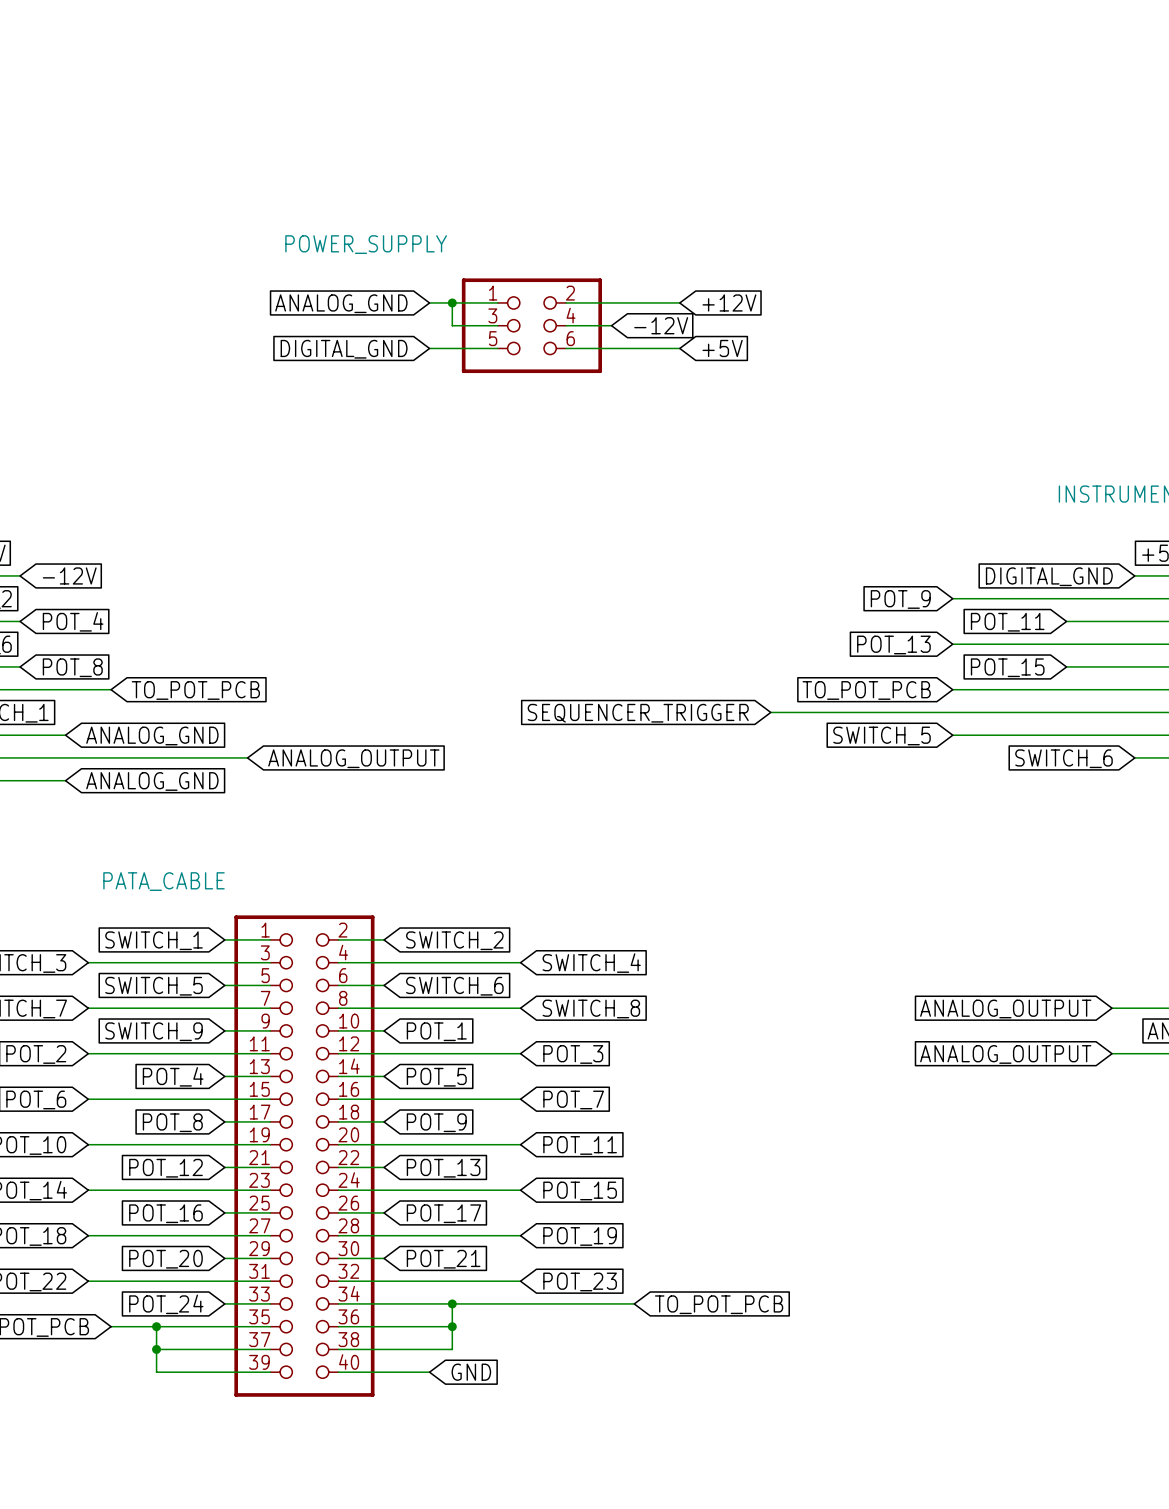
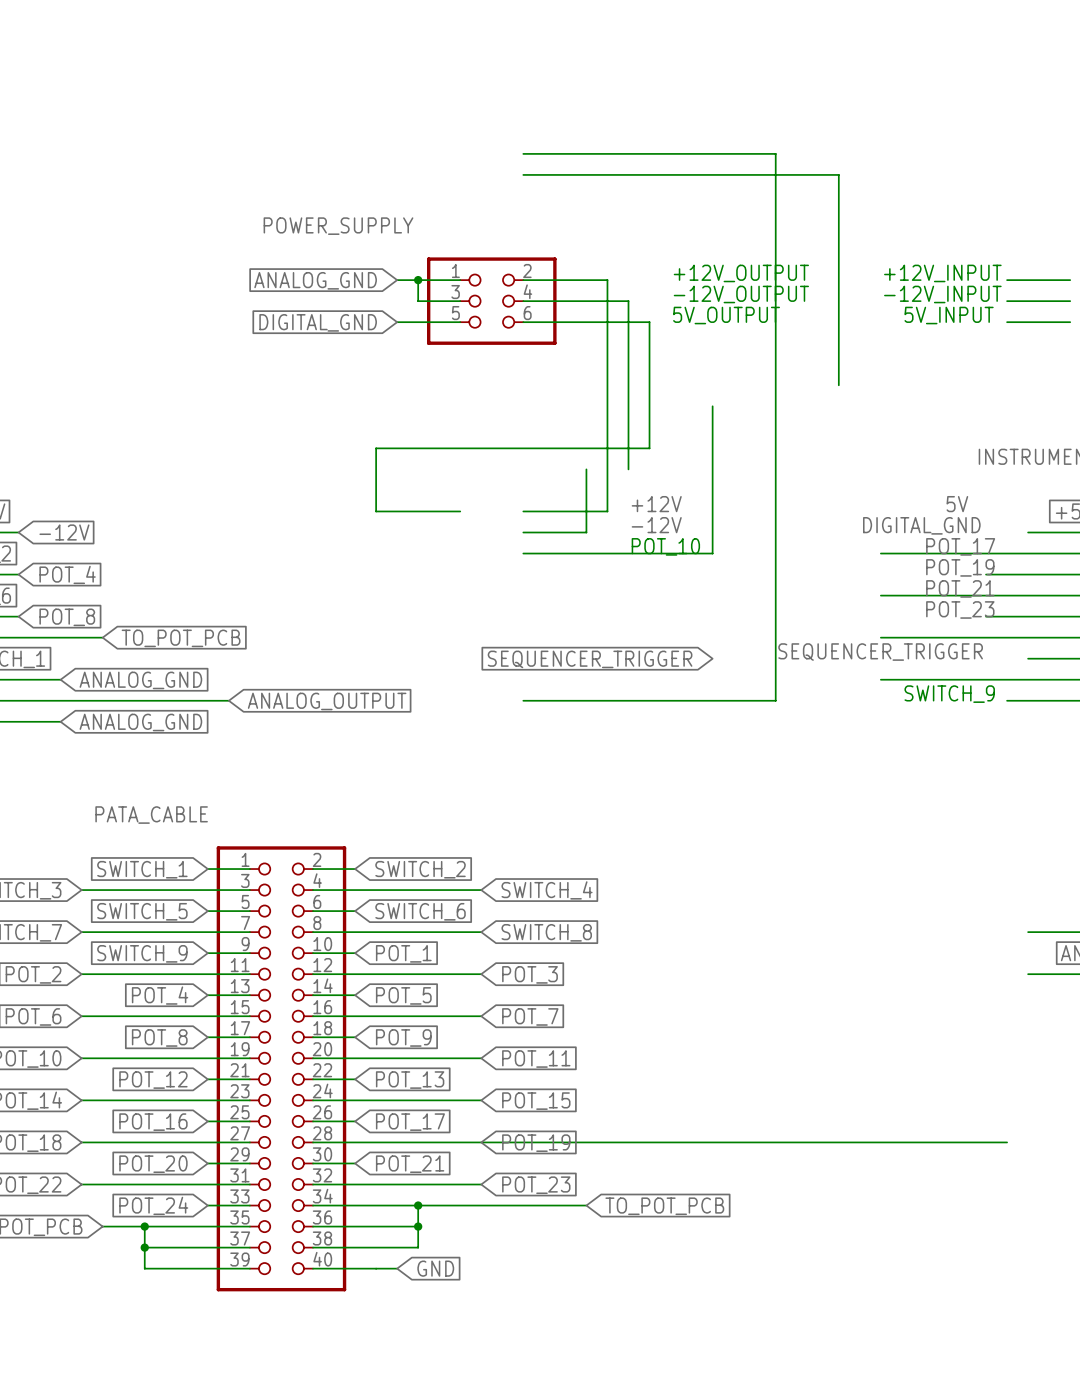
wire: none -> (523, 153) (775, 153) (775, 700) (523, 700)
wire: none -> (523, 174) (838, 174) (838, 385)
text: none -> +12V_OUTPUT (741, 273)
text: none -> +12V_INPUT (942, 273)
wire: (657, 302) (679, 302) -> (607, 280) (607, 511) (523, 511)
global label: +12V (729, 302) -> none
wire: none -> (1007, 280) (1070, 280)
text: none -> -12V_OUTPUT (741, 294)
text: none -> -12V_INPUT (942, 294)
wire: none -> (565, 301) (628, 301) (628, 469)
global label: -12V (661, 325) -> none
wire: none -> (1007, 301) (1070, 301)
text: none -> 5V_OUTPUT (726, 315)
text: none -> 5V_INPUT (949, 315)
wire: none -> (628, 322) (649, 322) (649, 448) (376, 448) (376, 511) (460, 511)
global label: +5V (722, 348) -> none
wire: none -> (1007, 322) (1070, 322)
wire: none -> (712, 406) (712, 553) (523, 553)
wire: none -> (586, 469) (586, 532) (523, 532)
label: none -> +12V (656, 504)
label: none -> 5V (957, 504)
label: none -> -12V (656, 525)
label: none -> DIGITAL_GND (921, 525)
wire: none -> (1028, 532) (1049, 532)
global label: DIGITAL_GND (1049, 576) -> none
text: none -> POT_10 (665, 546)
label: none -> POT_17 (960, 546)
global label: POT_9 (900, 599) -> none
label: none -> POT_19 (960, 567)
global label: POT_11 (1007, 622) -> none
label: none -> POT_21 (960, 588)
global label: POT_13 (893, 644) -> none
label: none -> POT_23 (960, 609)
global label: POT_15 (1007, 667) -> none
global label: TO_POT_PCB (866, 690) -> none
label: none -> SEQUENCER_TRIGGER (880, 652)
wire: (770, 712) (1112, 712) -> none
global label: SWITCH_5 (882, 735) -> none
text: none -> SWITCH_9 (949, 694)
wire: none -> (1007, 700) (1049, 700)
global label: SWITCH_6 (1063, 758) -> none
global label: ANALOG_OUTPUT (1005, 1008) -> none
global label: ANALOG_OUTPUT (1005, 1054) -> none
wire: none -> (481, 1142) (1007, 1142)

